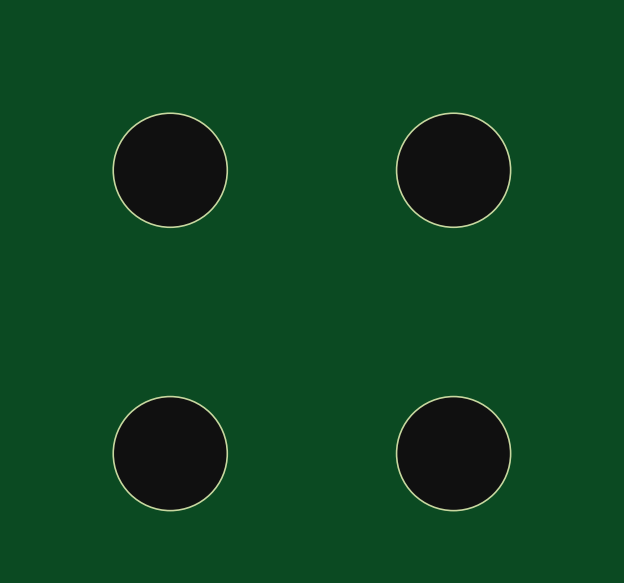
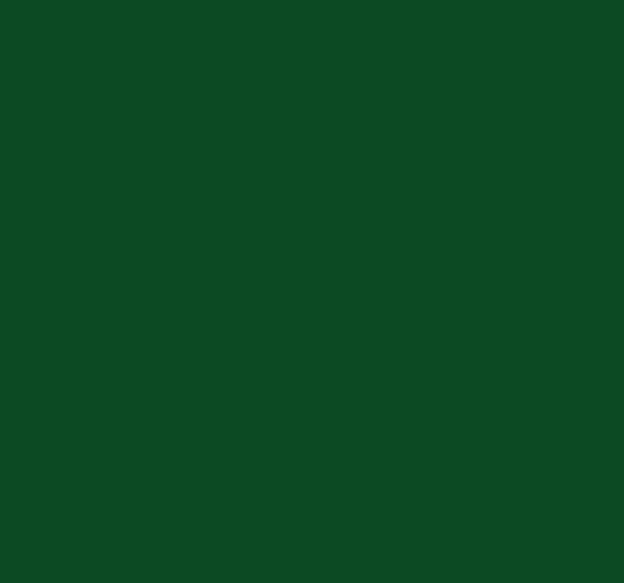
part: (170, 170) -> none
part: (453, 170) -> none
part: (170, 453) -> none
part: (453, 453) -> none

